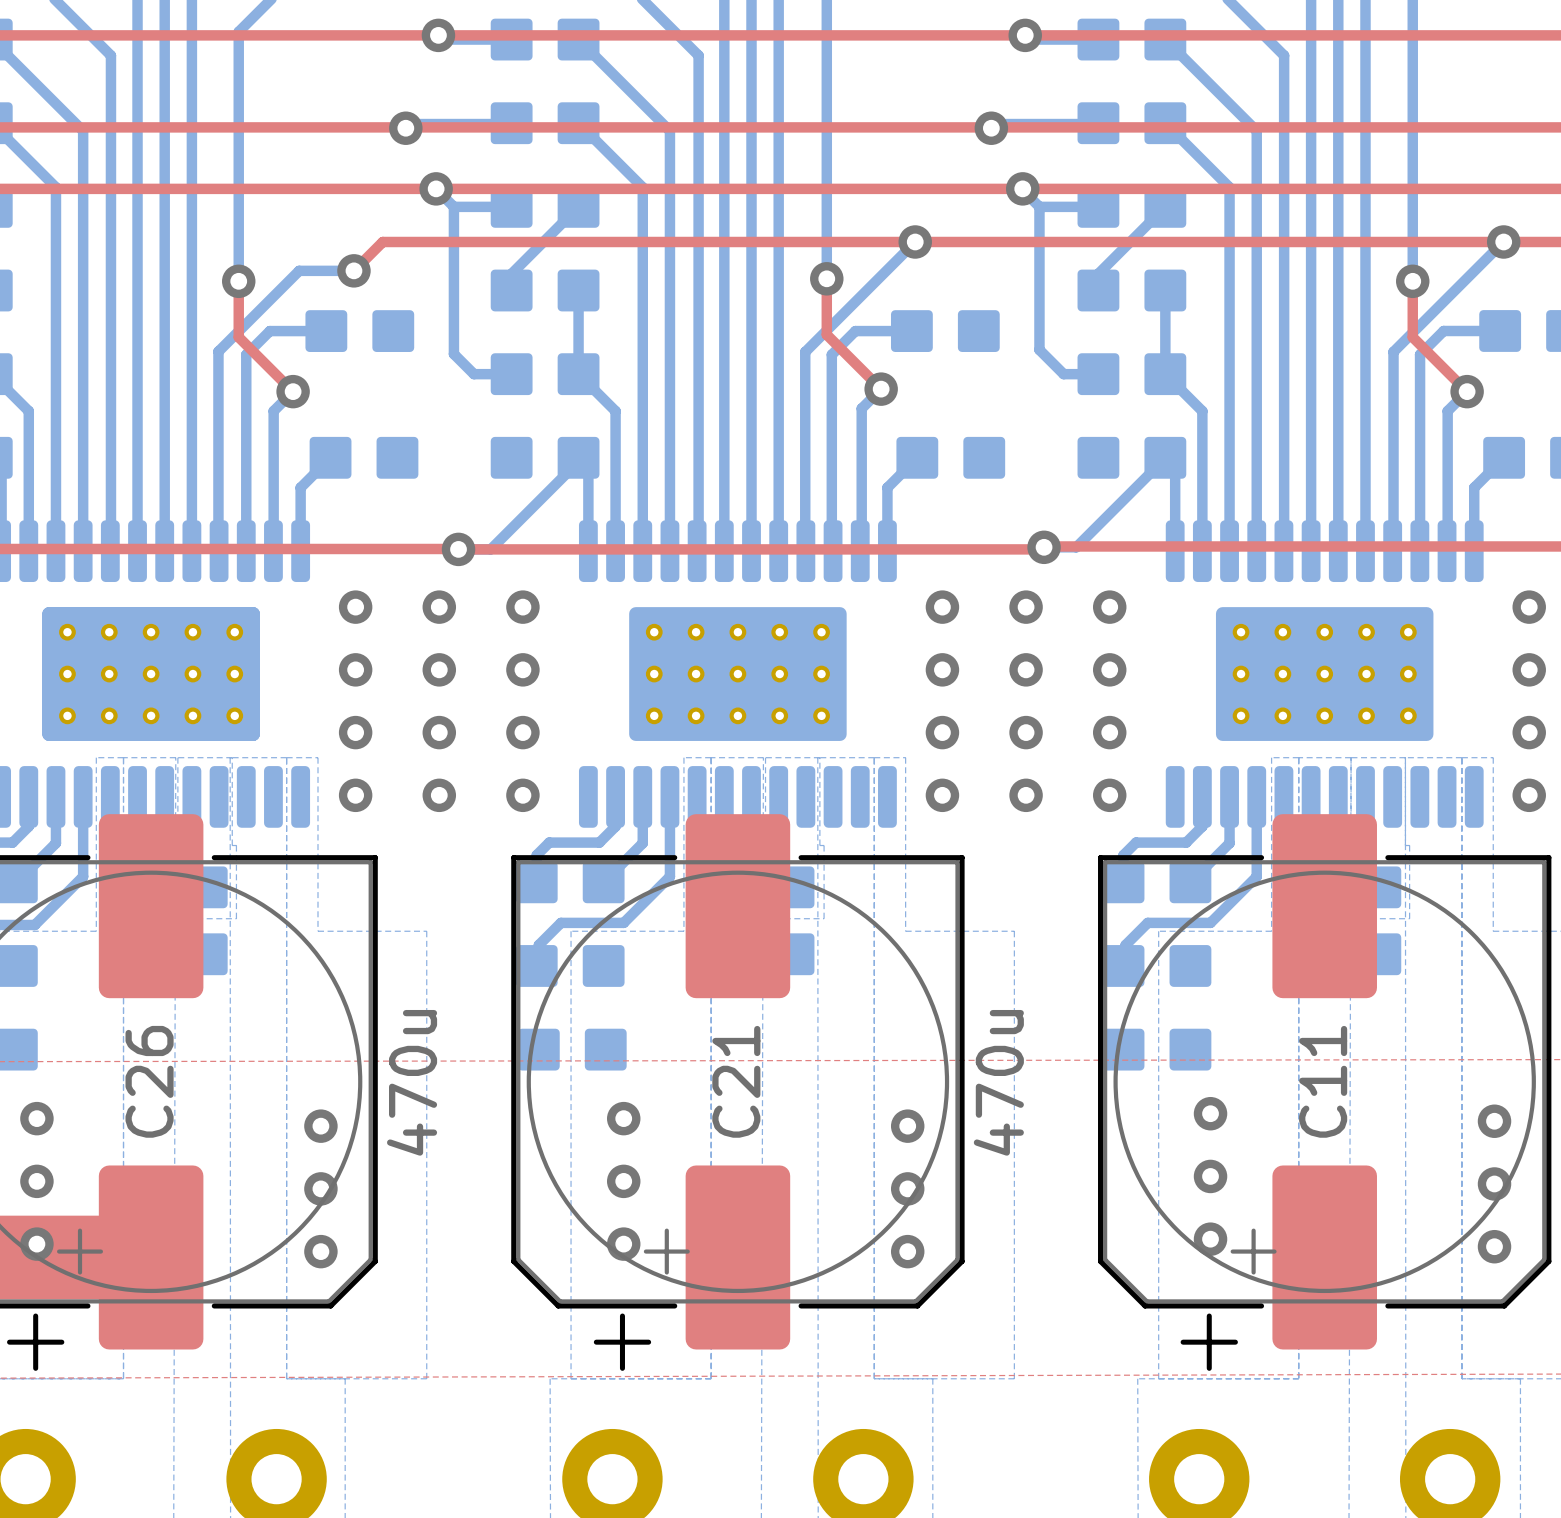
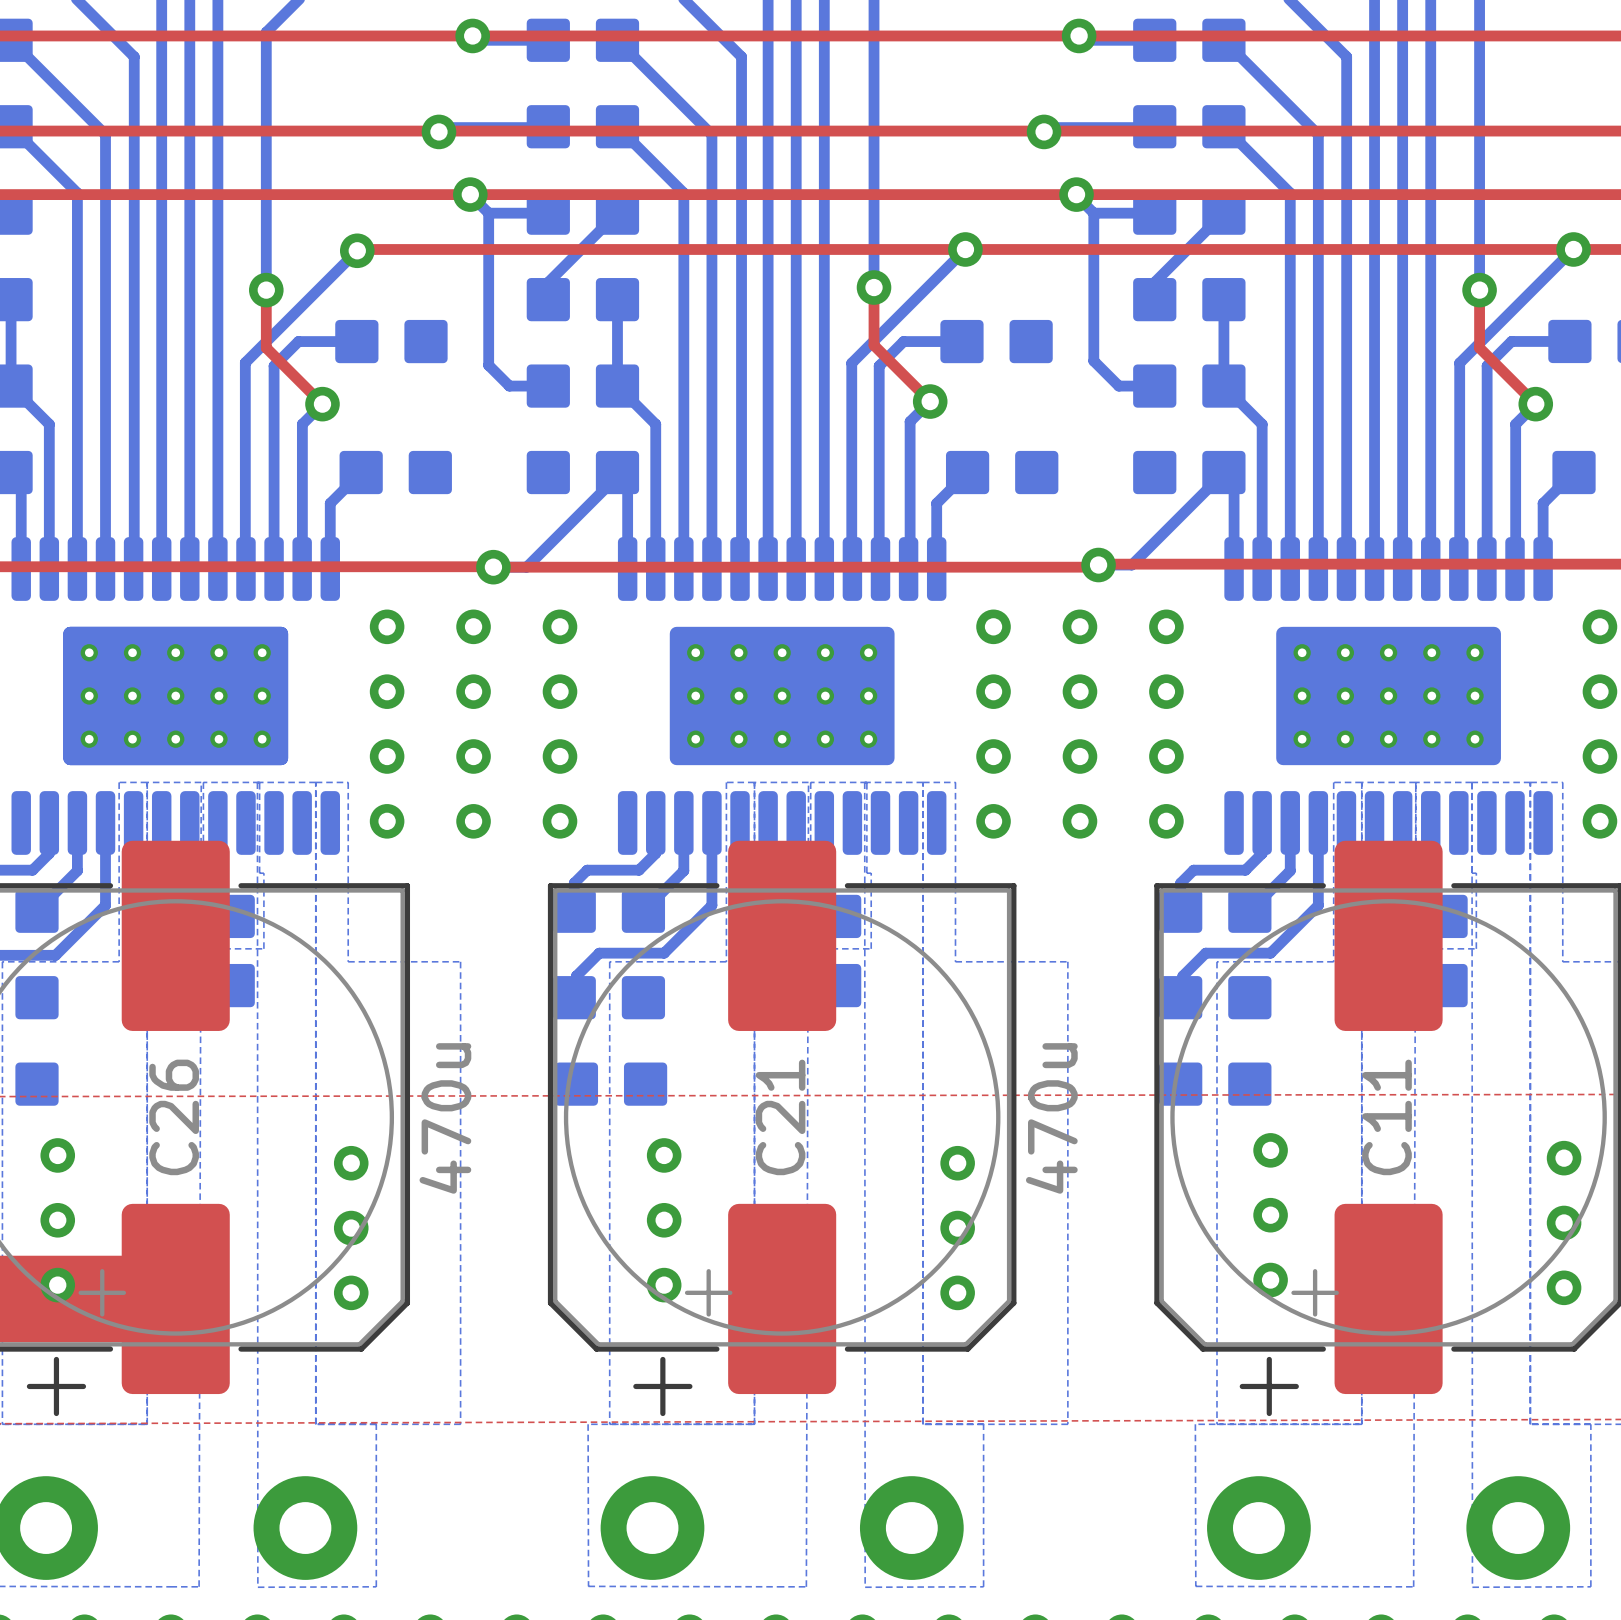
top track: (382, 241) (353, 270) -> (415, 249) (357, 250)
bottom track: (299, 270) (353, 270) -> (328, 279) (357, 250)
via position: (353, 270) -> (357, 250)

